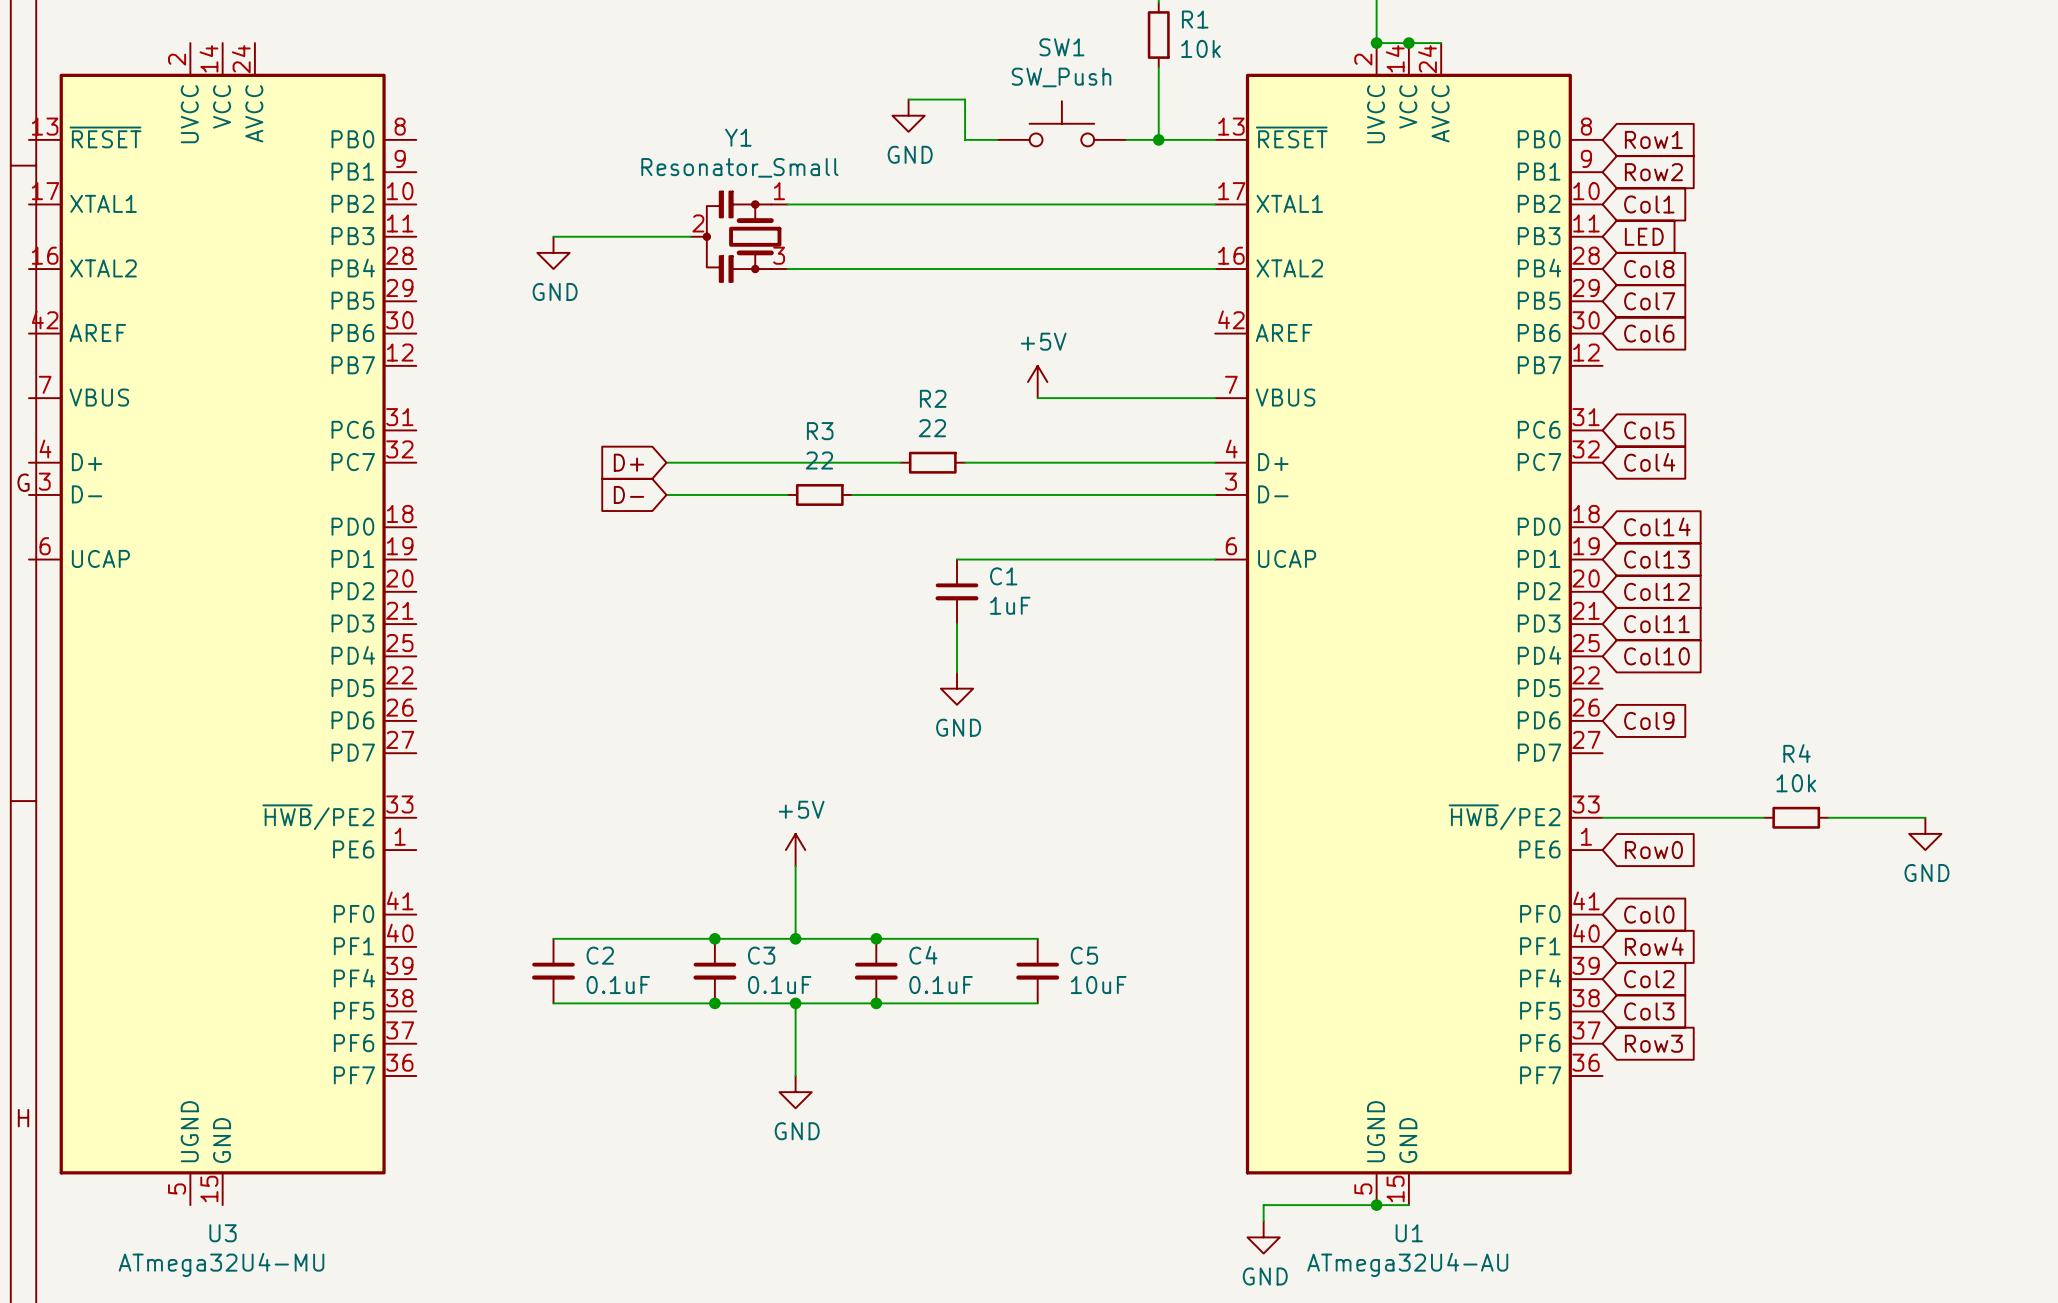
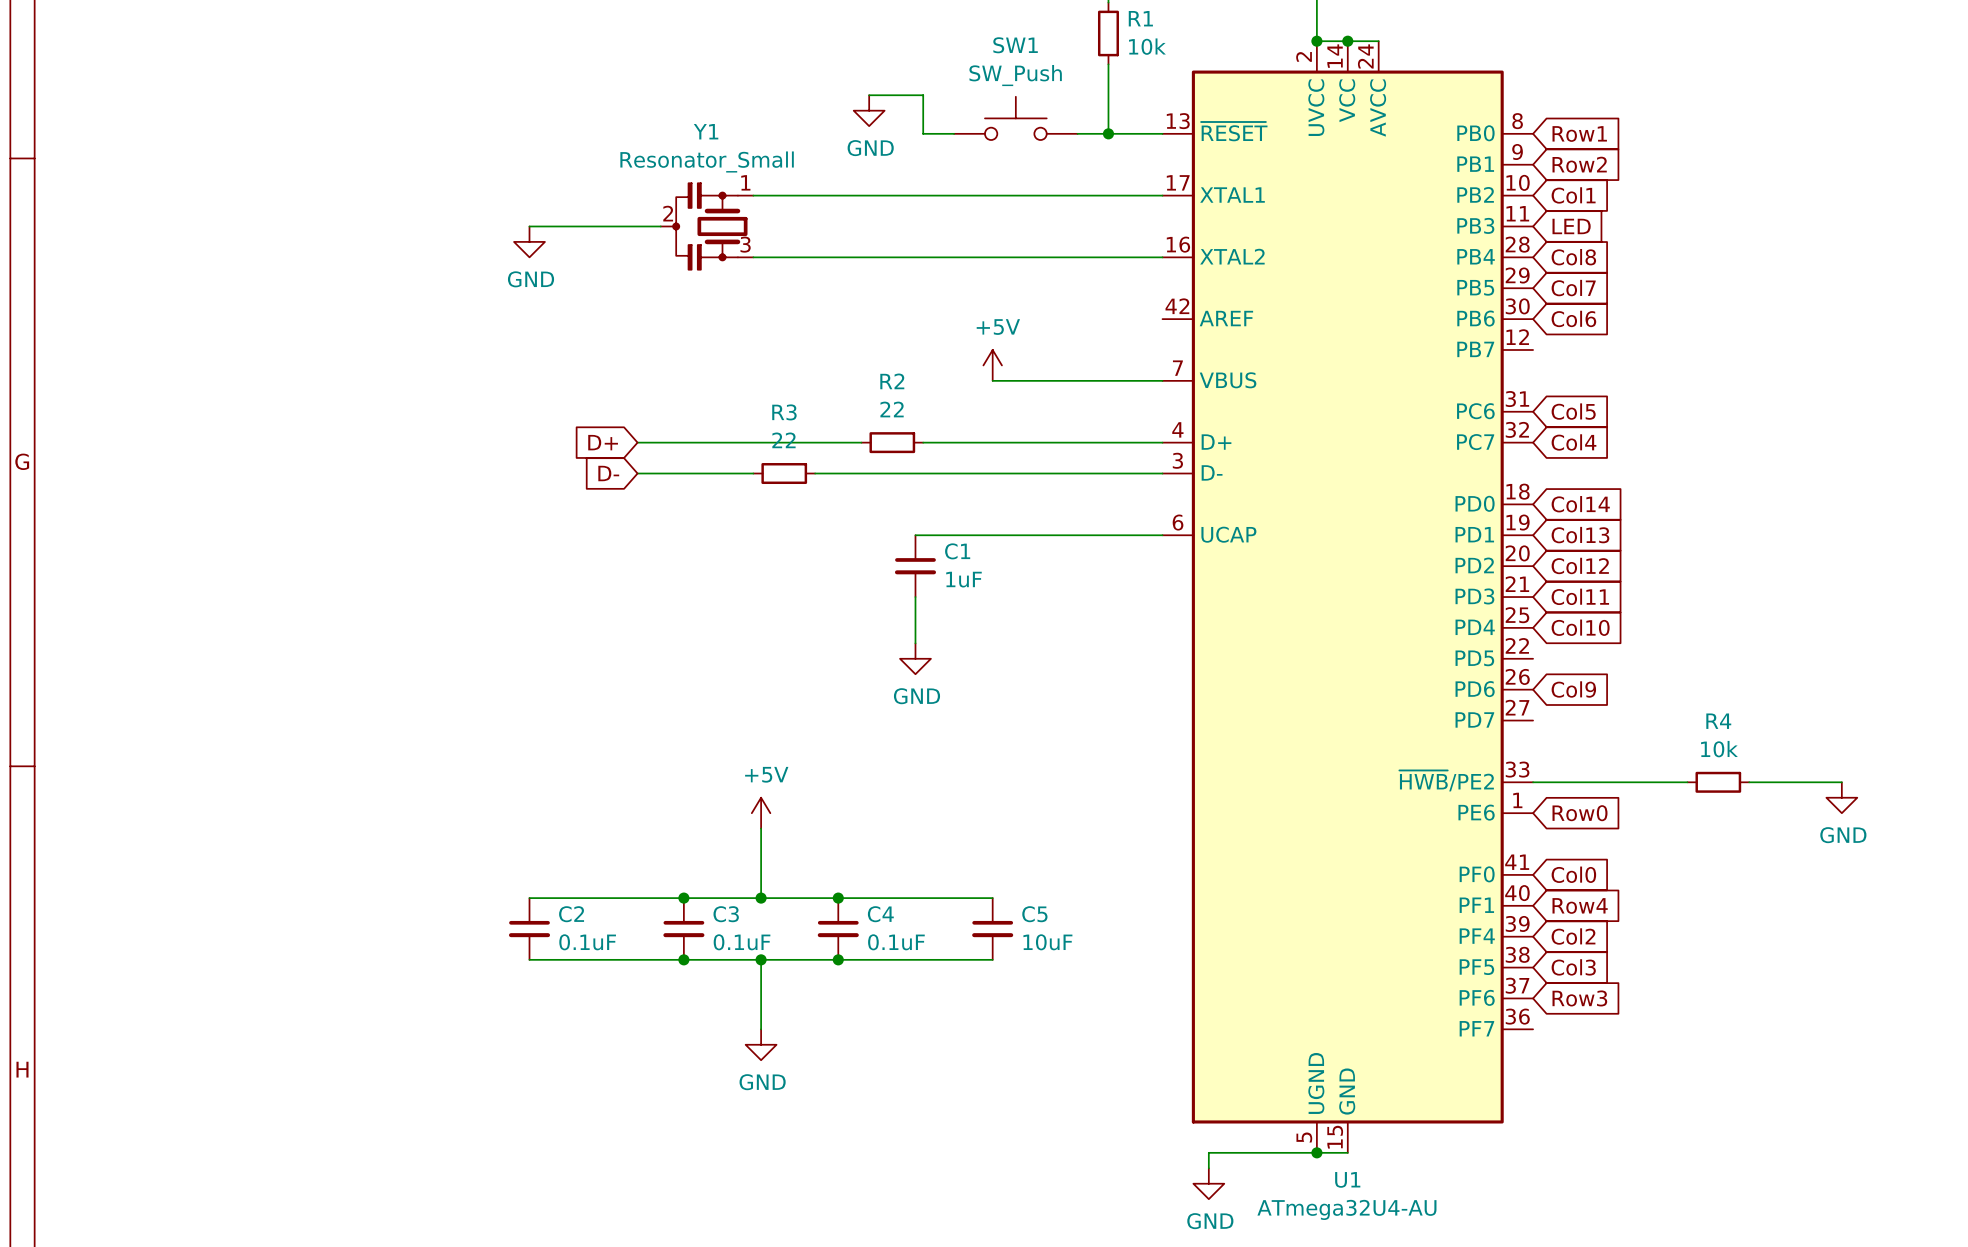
U3: ATmega32U4-MU (222, 624) -> none

